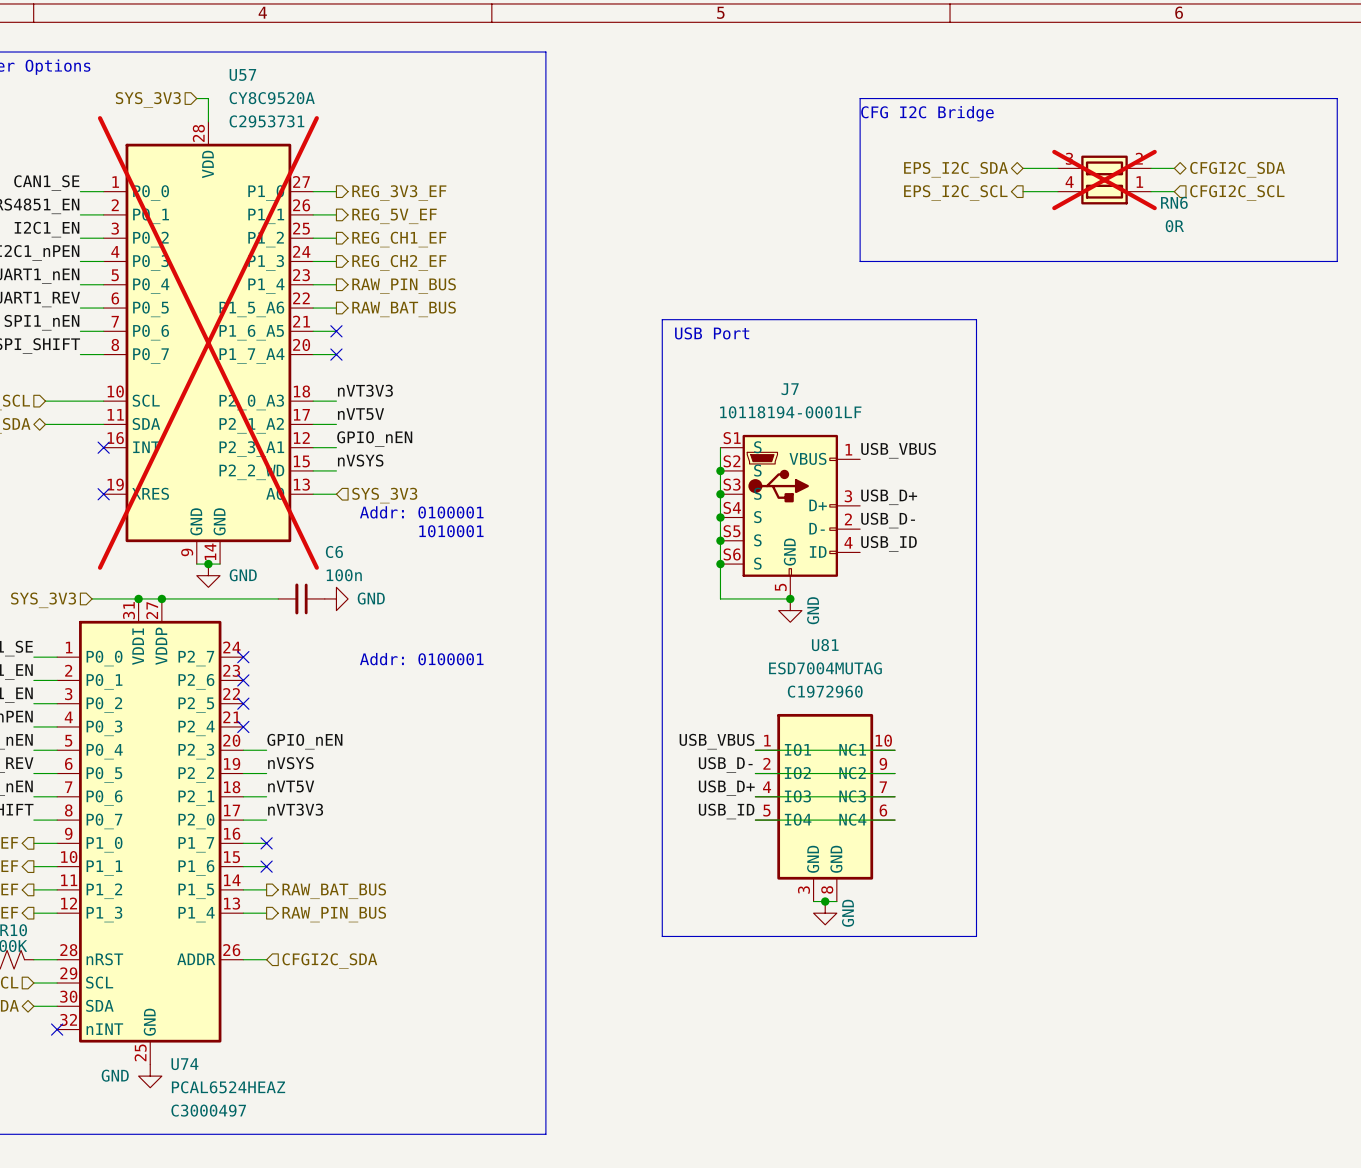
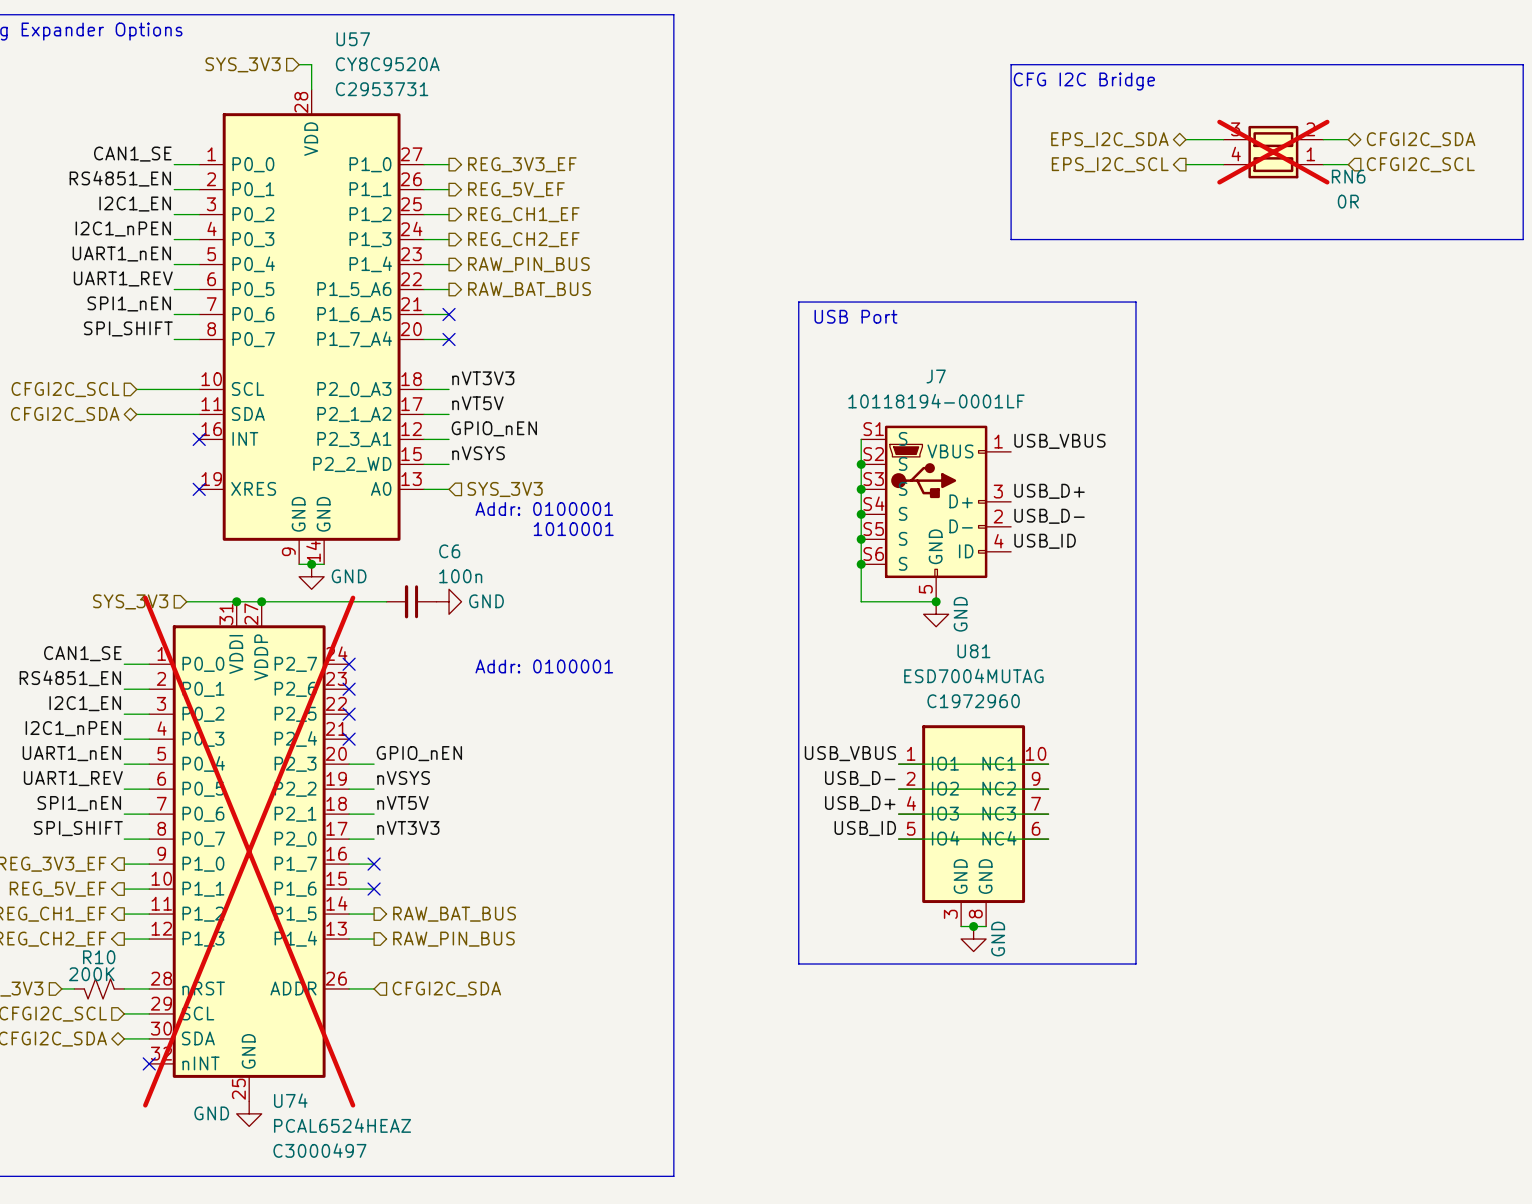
U57 do-not-place cross: (208, 342) -> none
U74 do-not-place cross: none -> (249, 851)

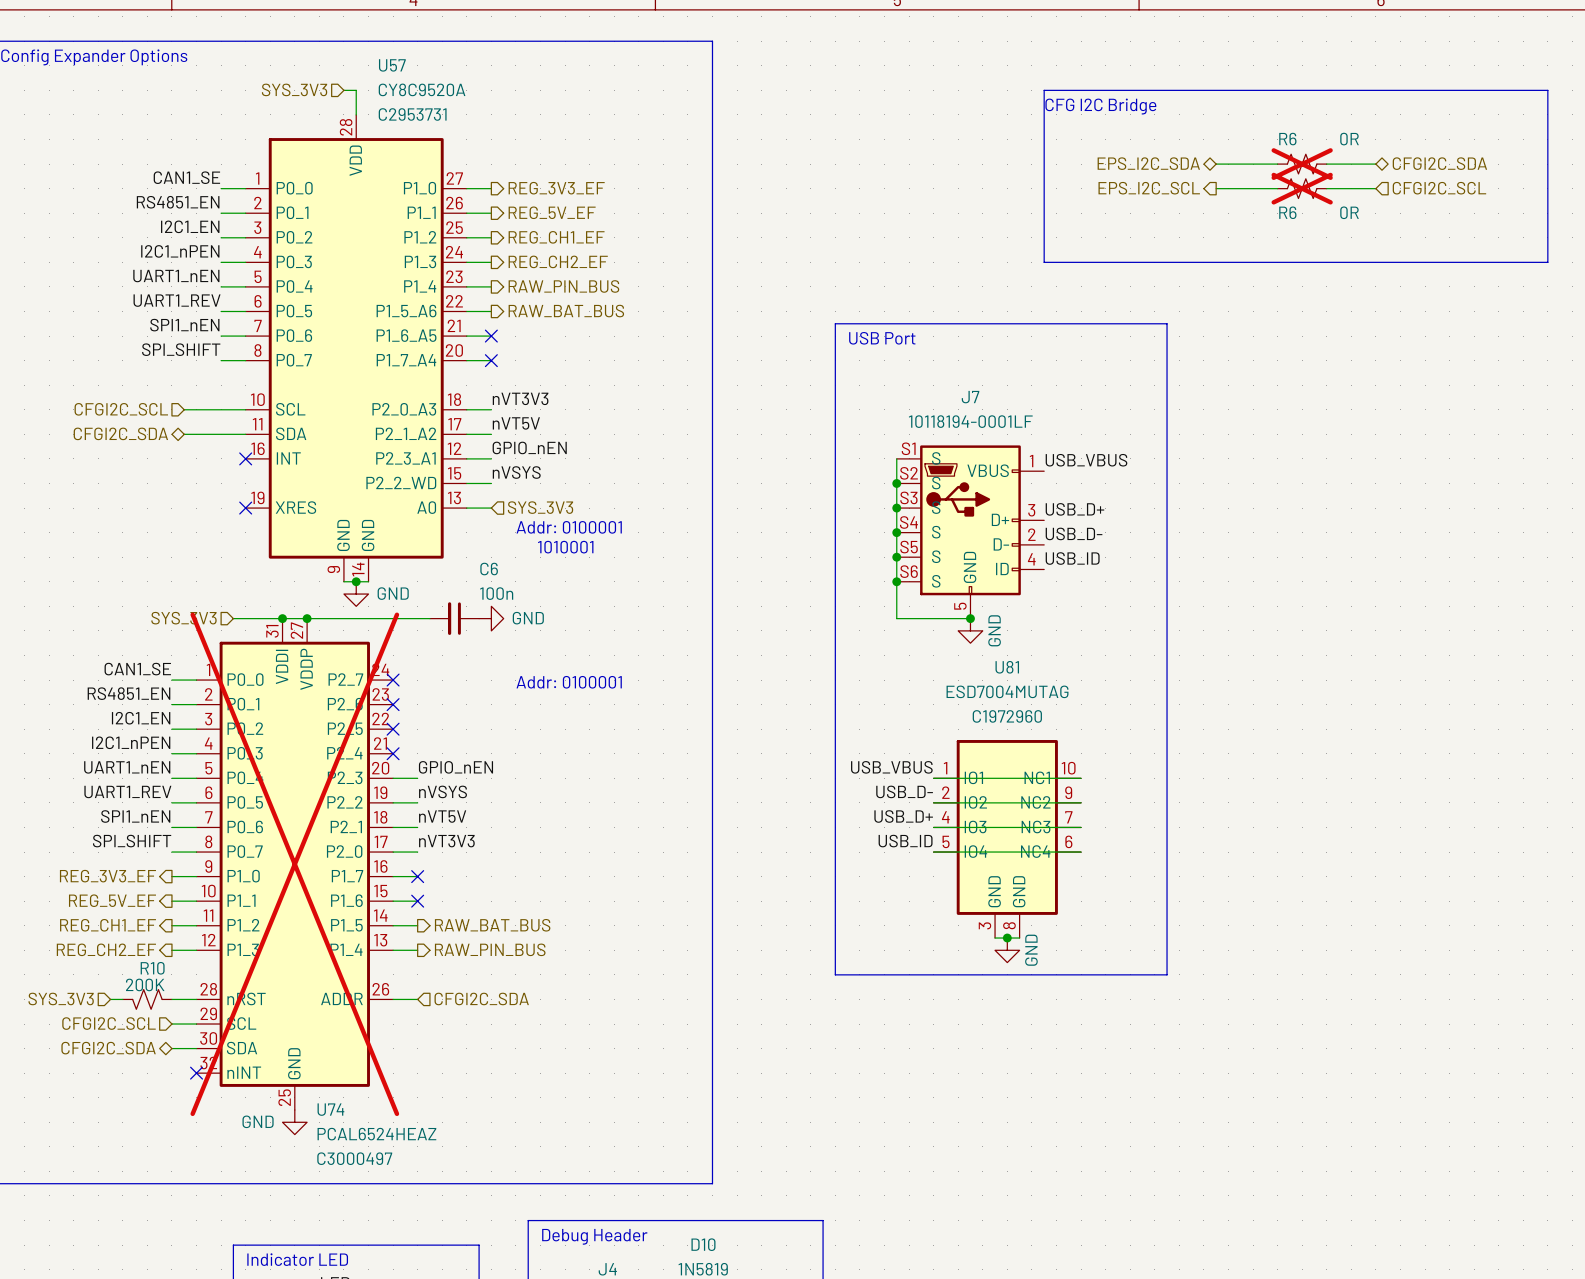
R6: none -> 0R (1302, 164)
RN6: 0R (1273, 152) -> none
R6: none -> 0R (1302, 188)

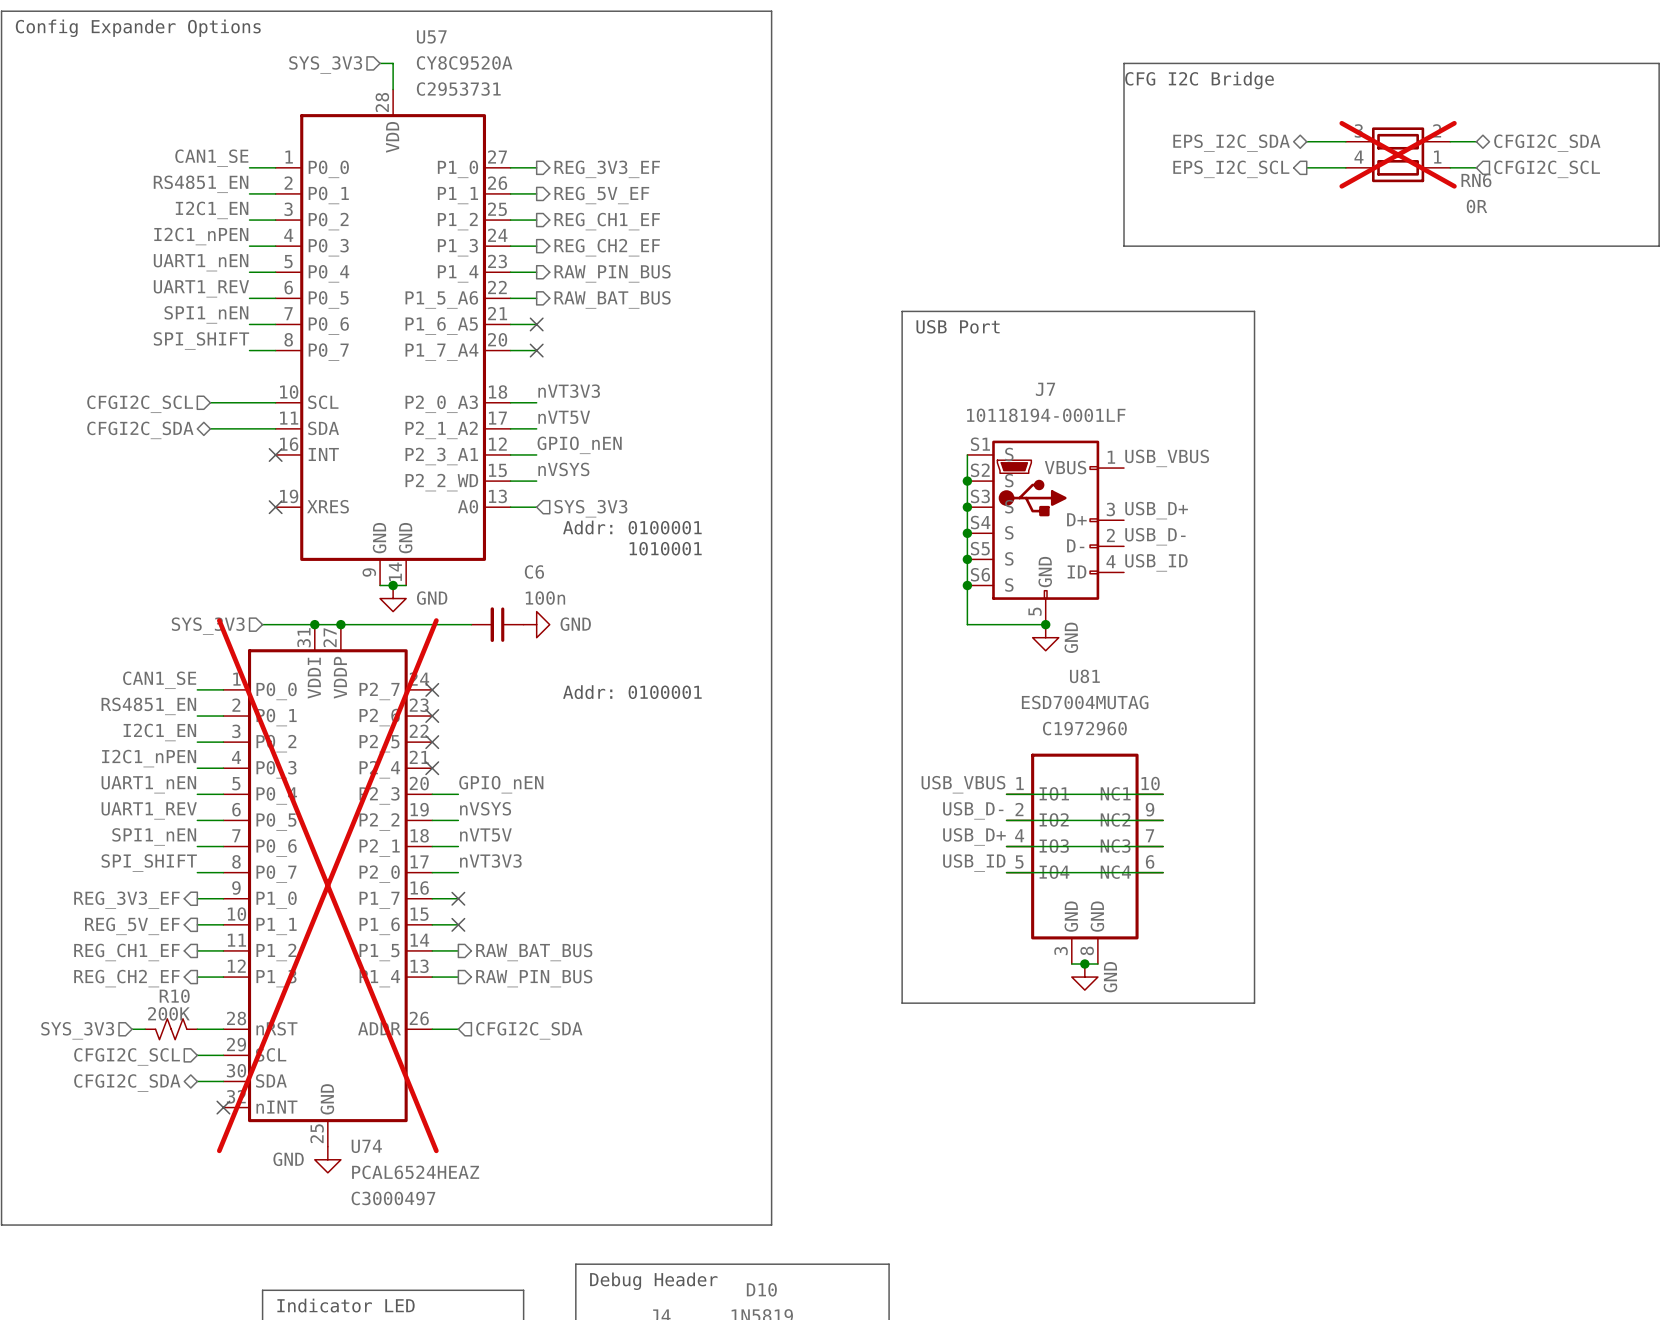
R6: 0R (1302, 164) -> none
RN6: none -> 0R (1398, 154)
R6: 0R (1302, 188) -> none

